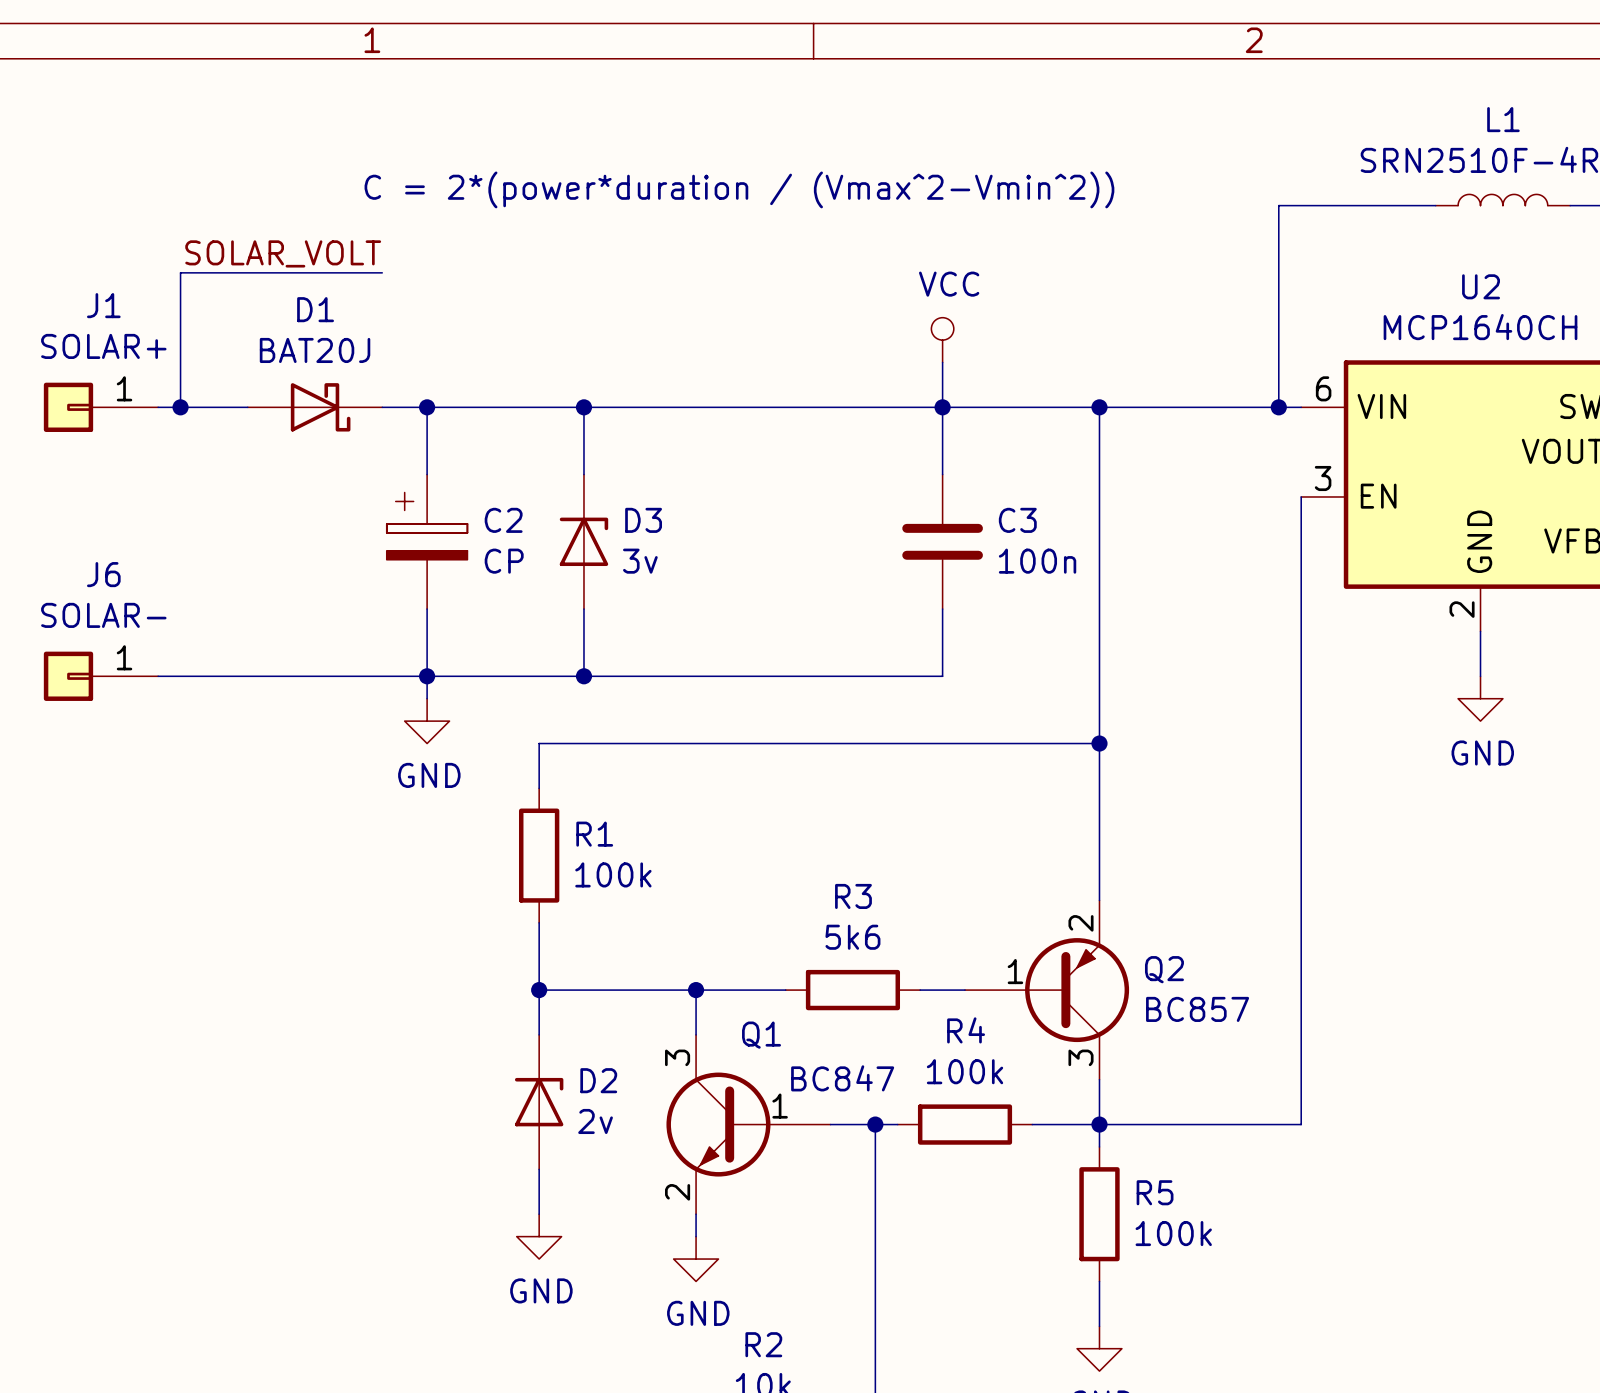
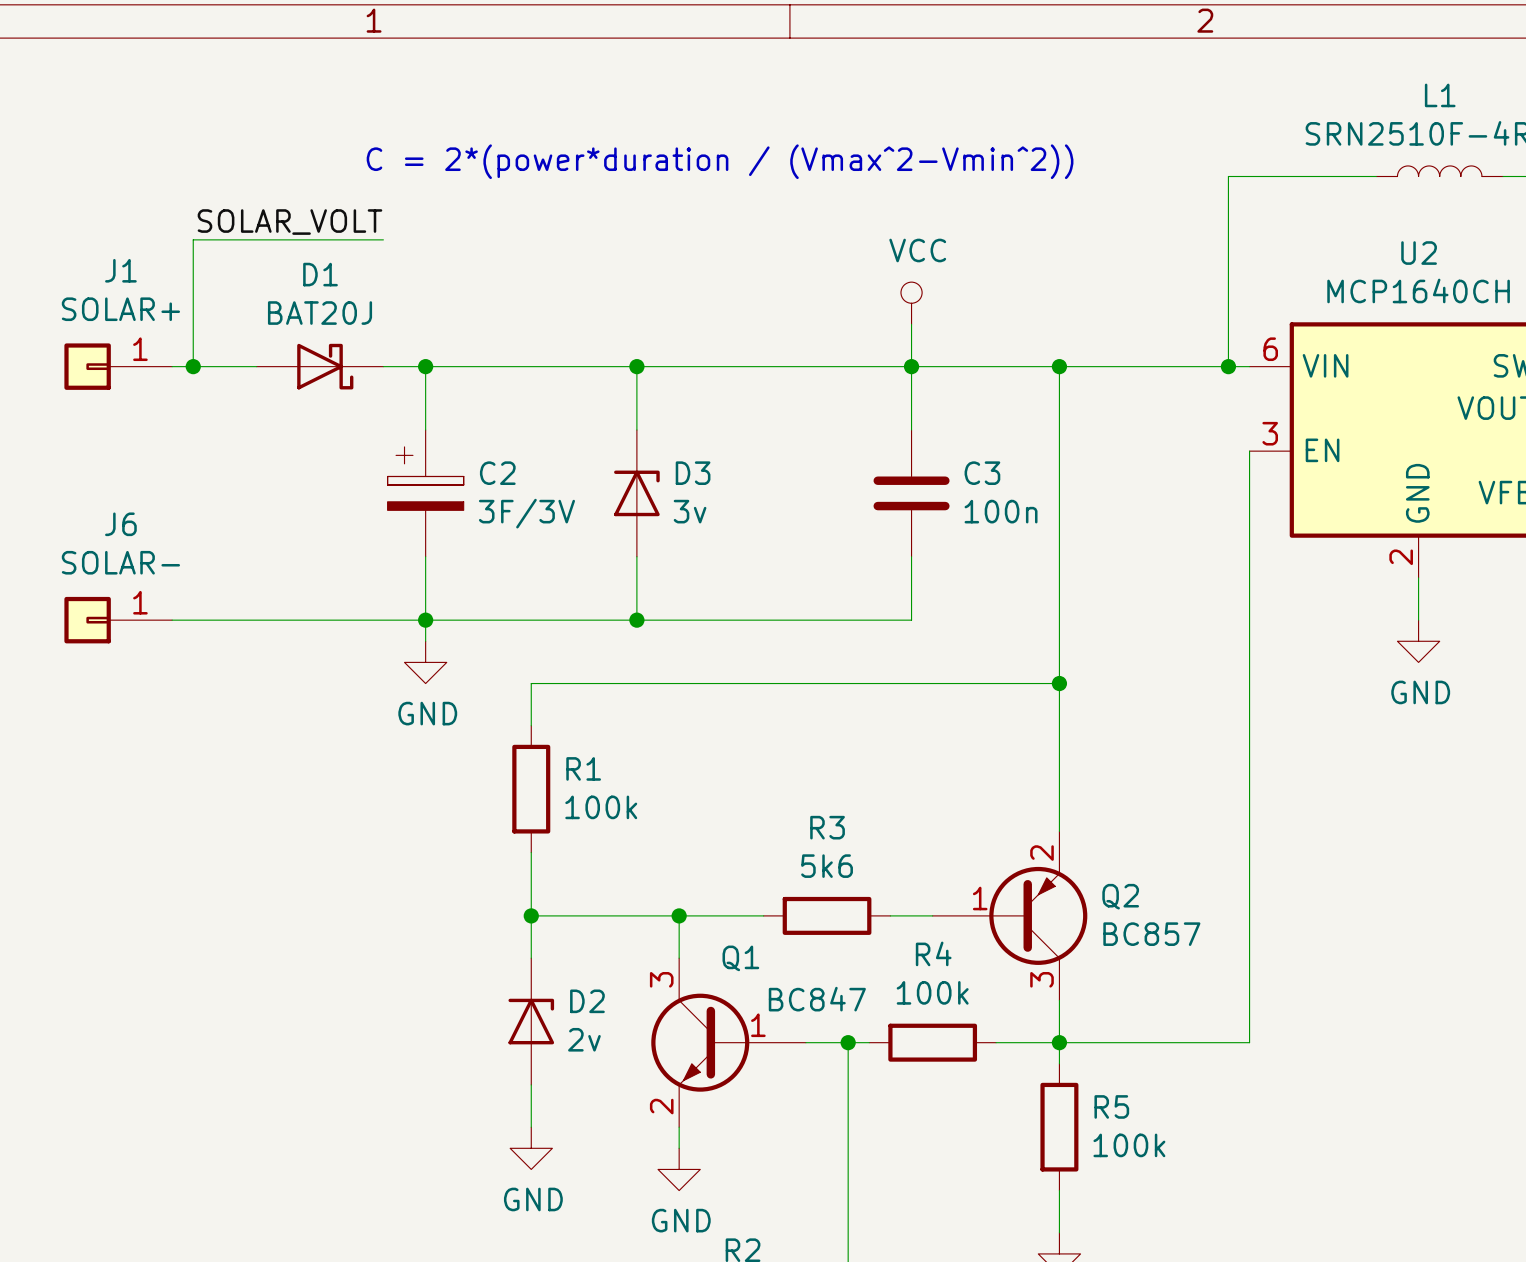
wire: (583, 407) (583, 474) -> (636, 366) (636, 430)
junction position: (583, 407) -> (636, 366)
D3 position: (583, 541) -> (636, 493)
C2 value: CP (504, 561) -> 3F/3V (526, 513)
wire: (583, 609) (583, 676) -> (636, 556) (636, 620)
junction position: (583, 676) -> (636, 620)

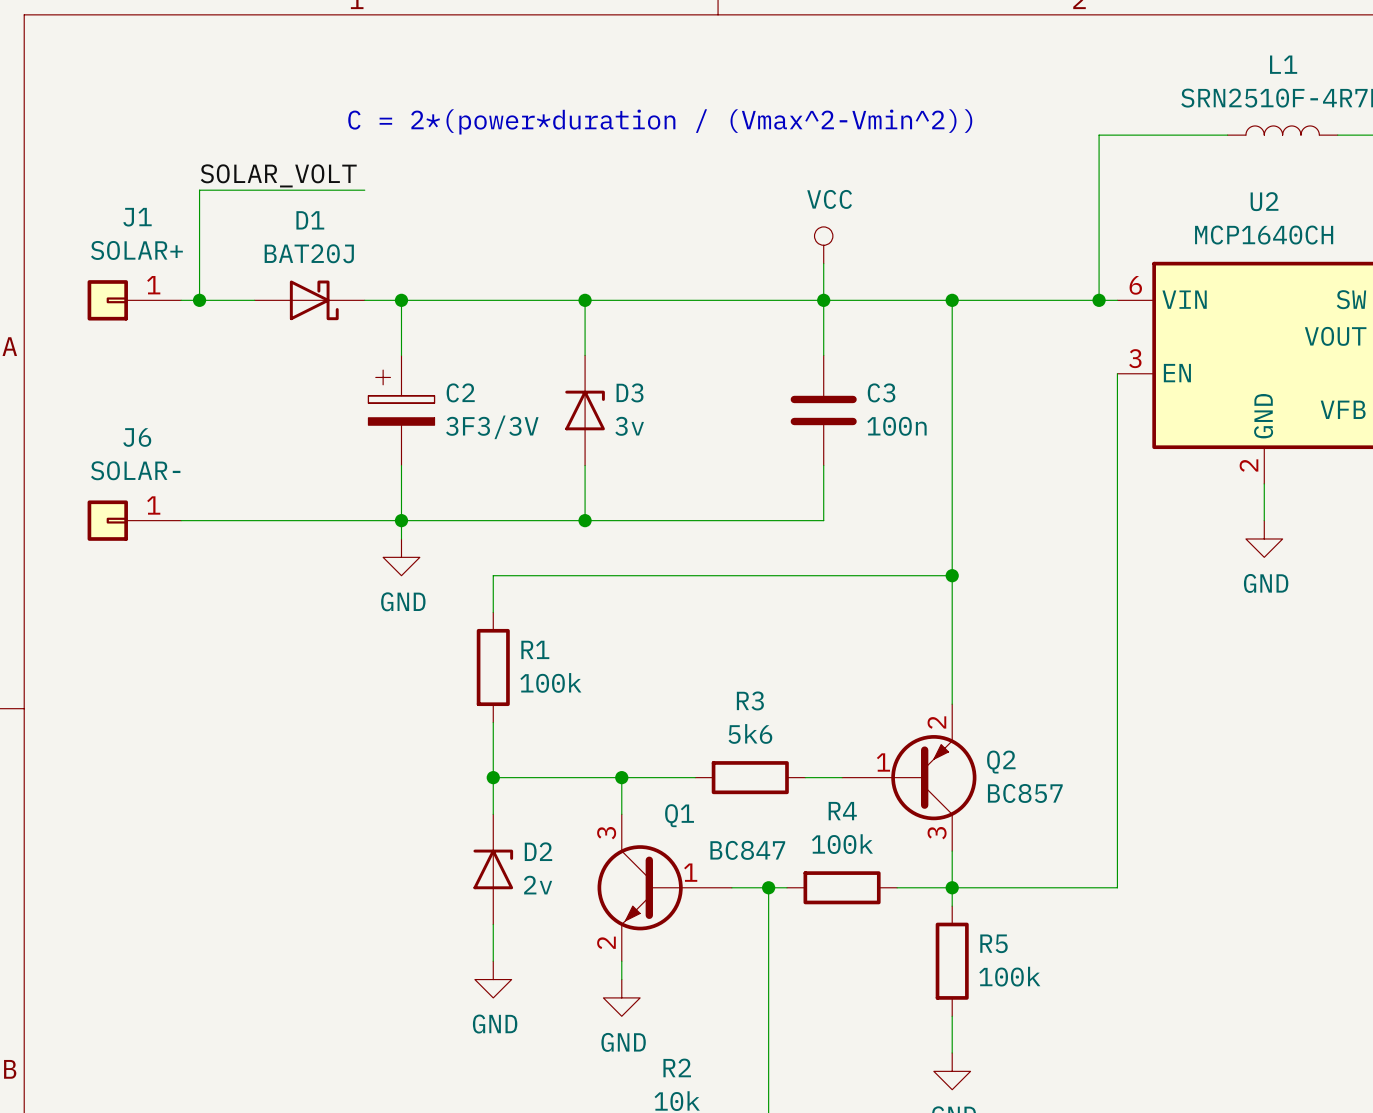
C2 value: 3F/3V (526, 513) -> 3F3/3V (492, 427)

